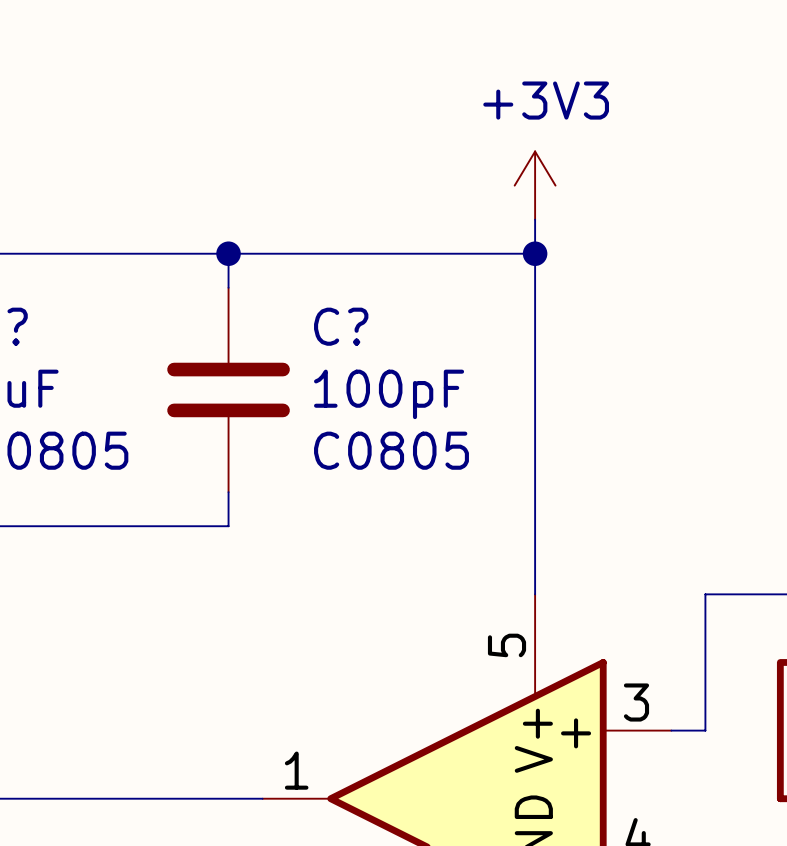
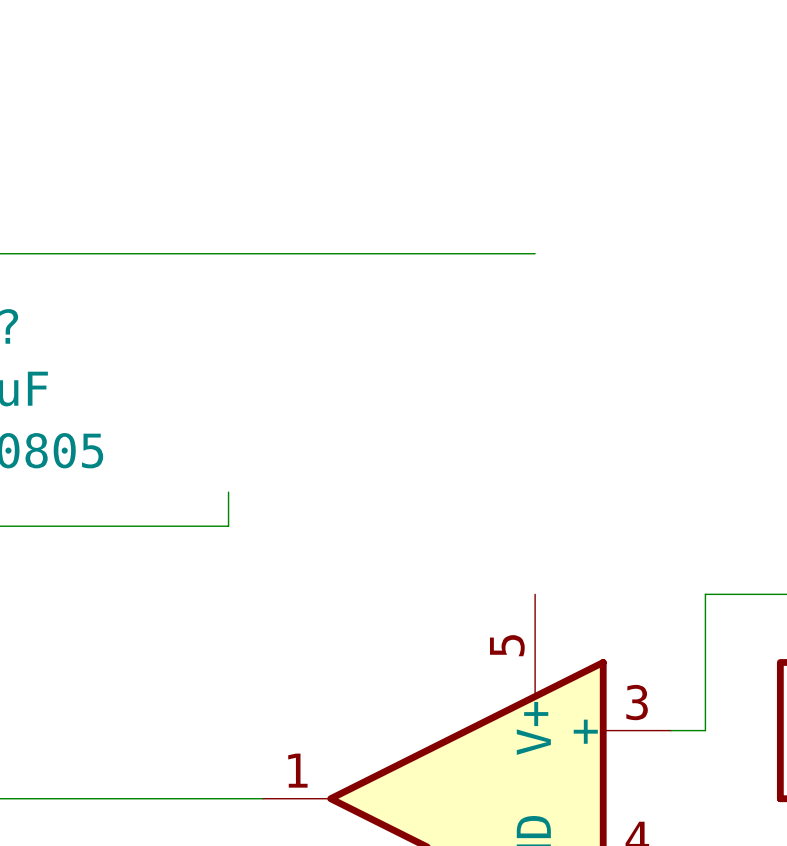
power symbol: +3V3 (535, 185) -> none
wire: (535, 219) (535, 594) -> none
wire: (228, 253) (228, 287) -> none
junction: (228, 253) -> none
junction: (535, 253) -> none
C?: 100pF (228, 389) -> none

